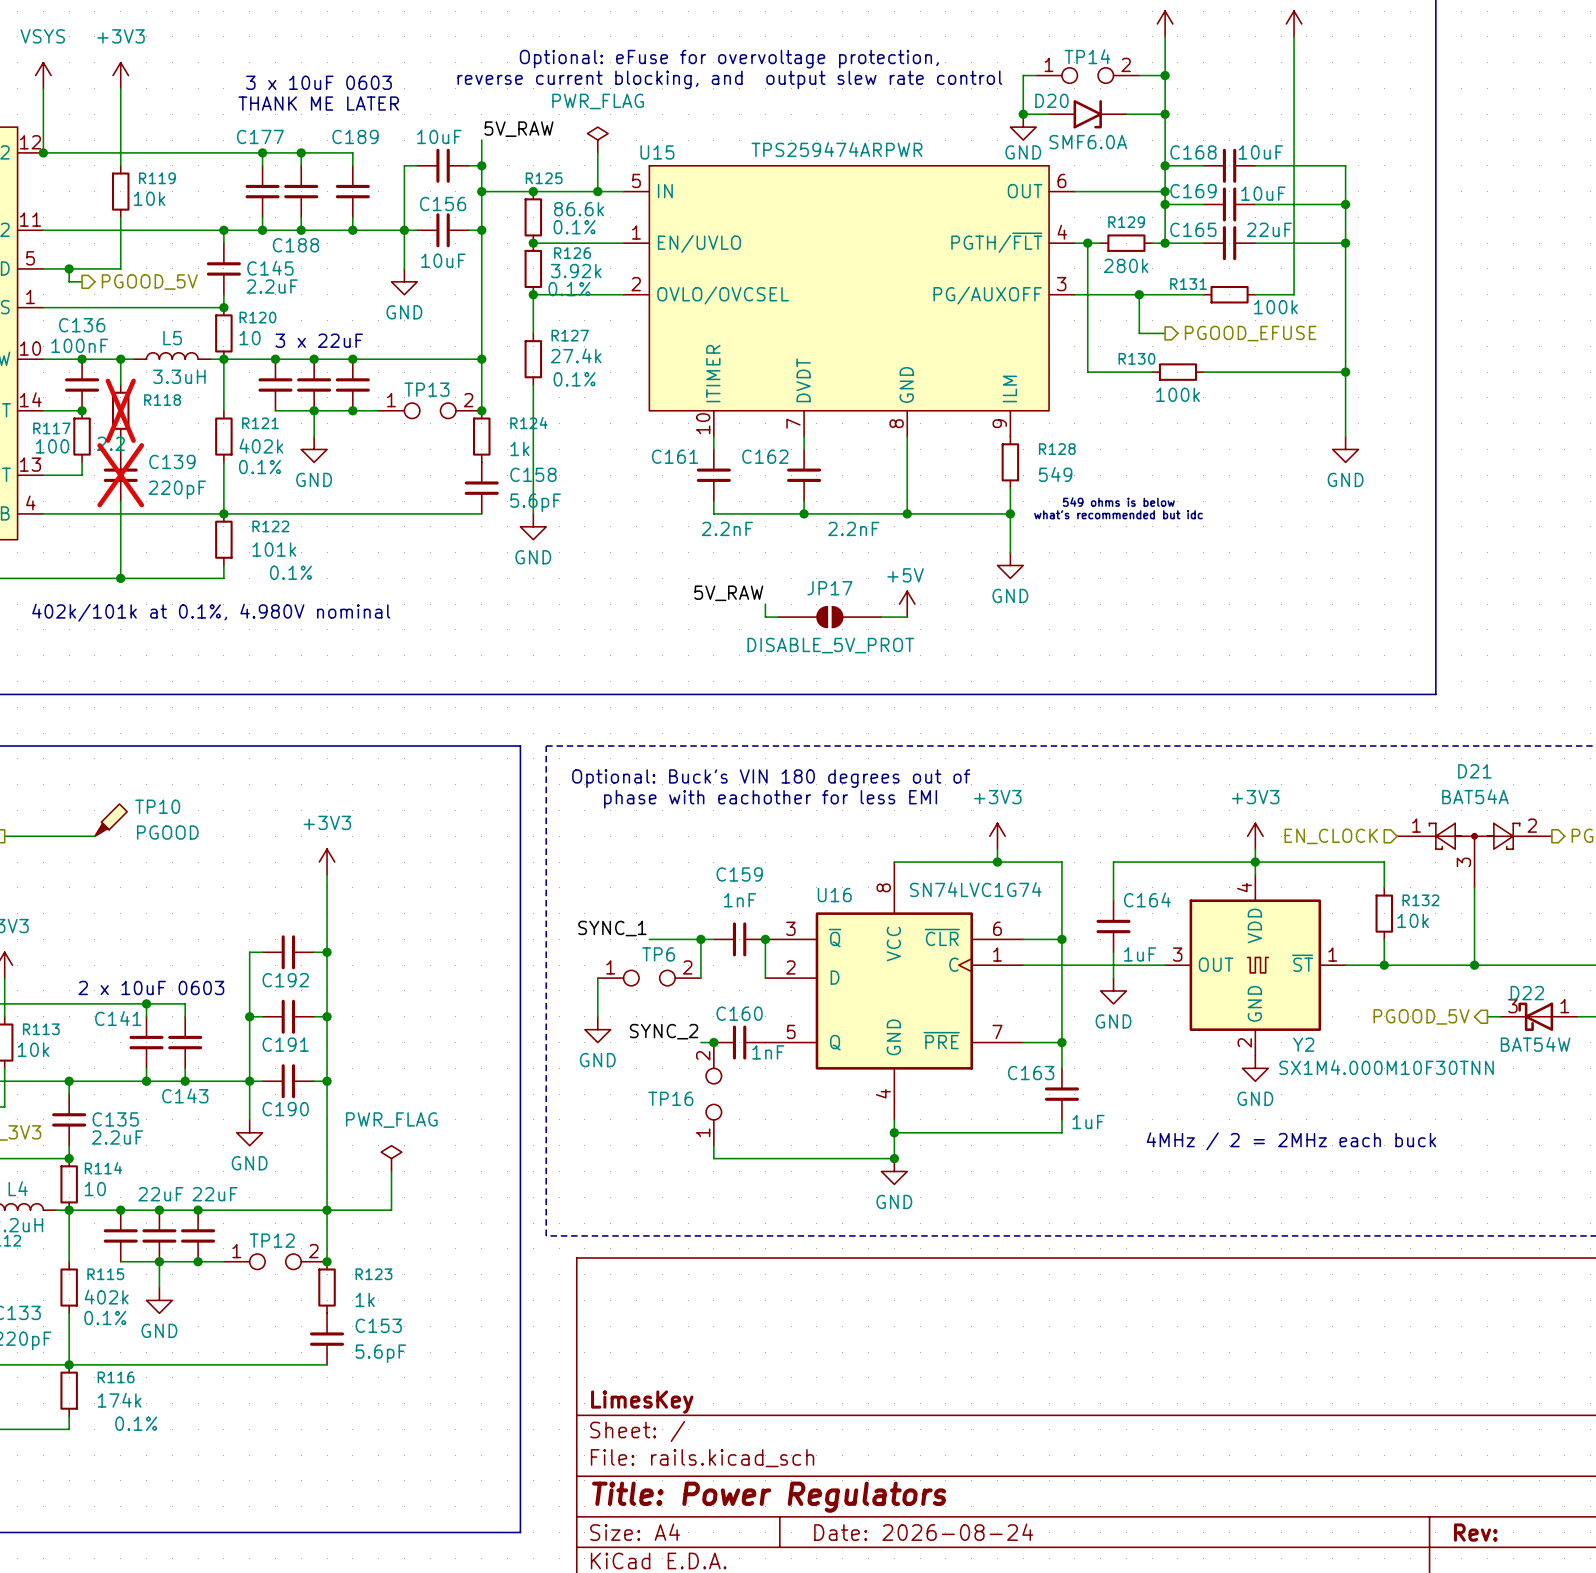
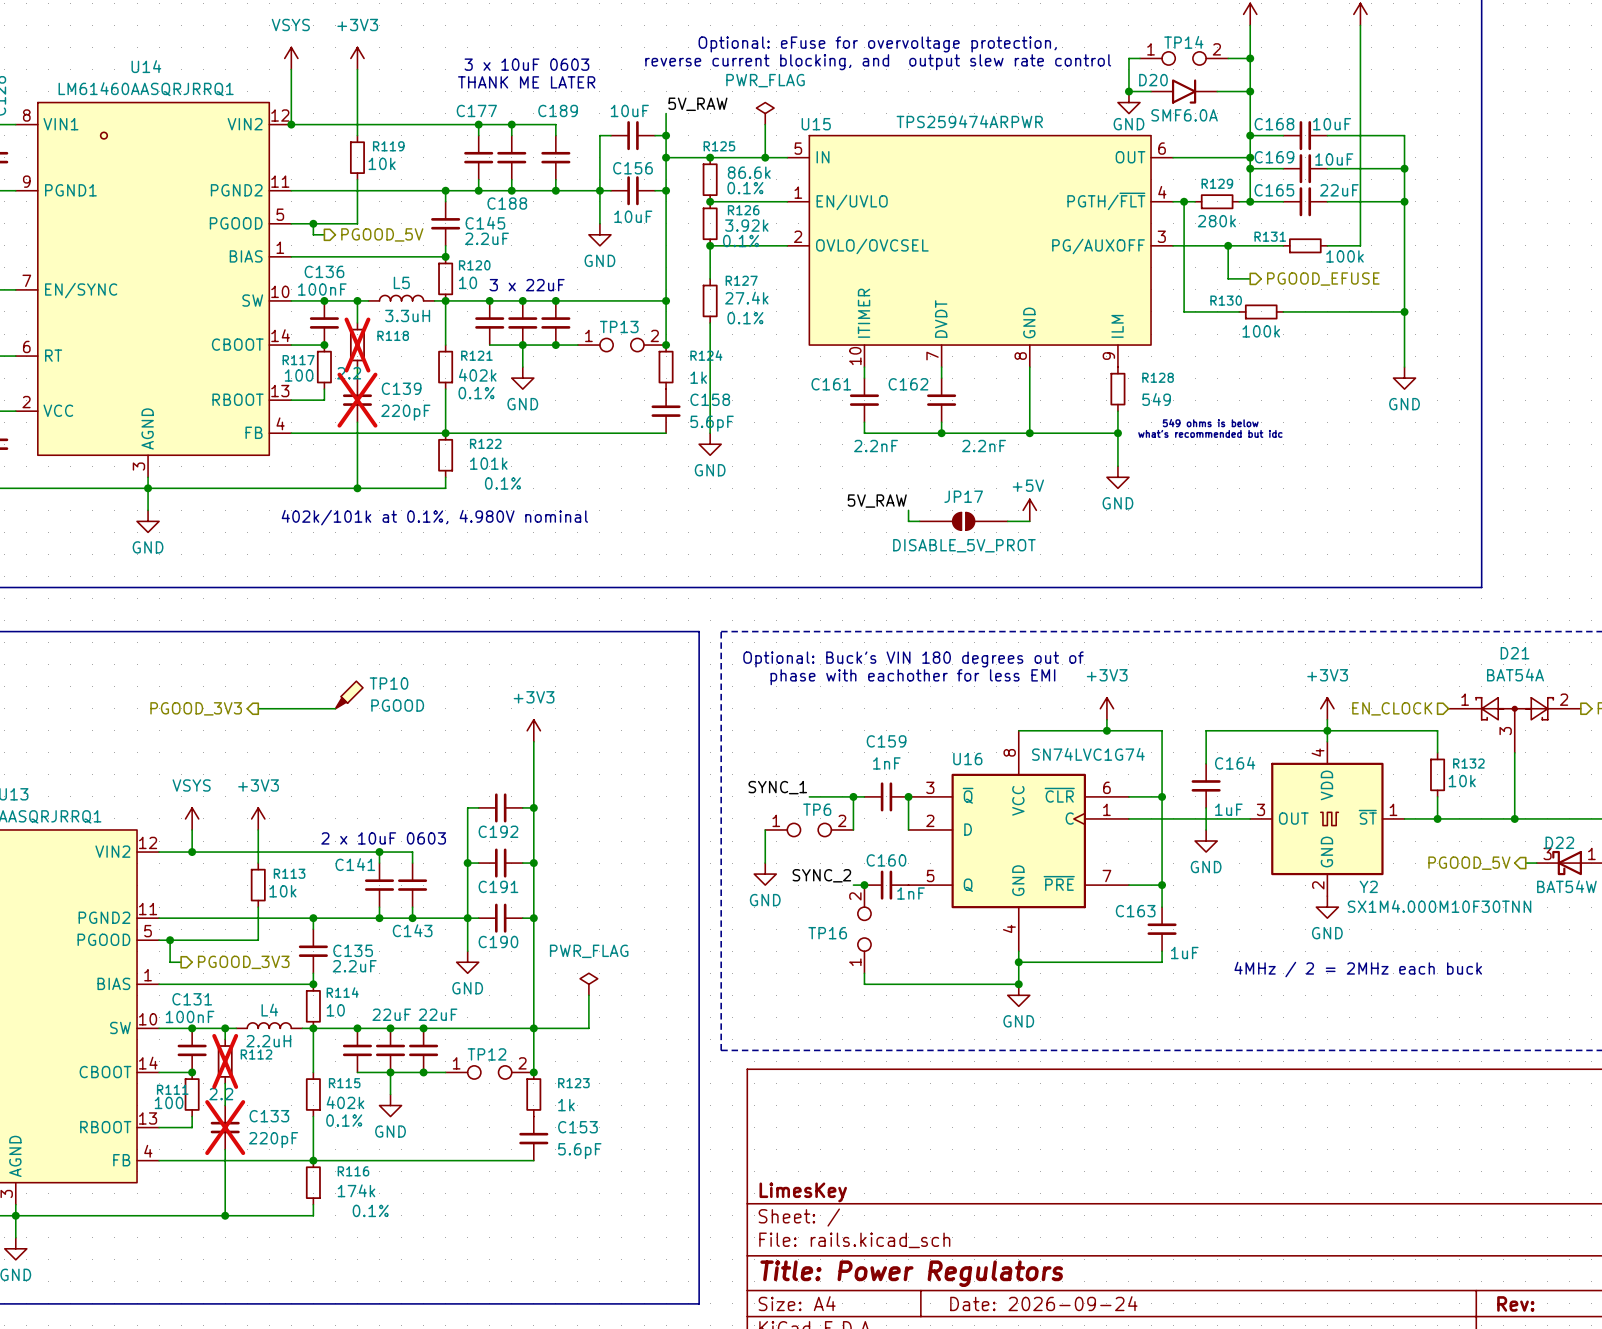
title block: Date: 2026-08-24 (923, 1532) -> Date: 2026-09-24 (1043, 1303)

